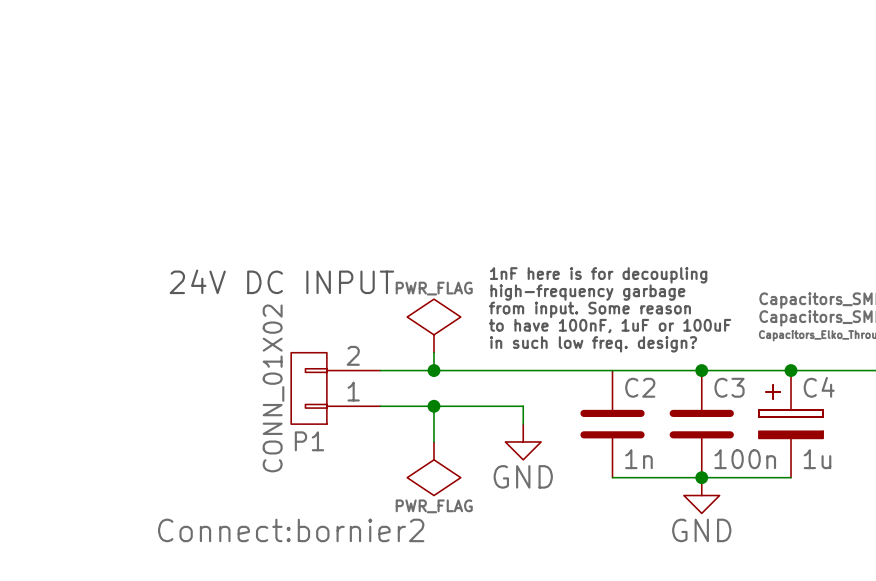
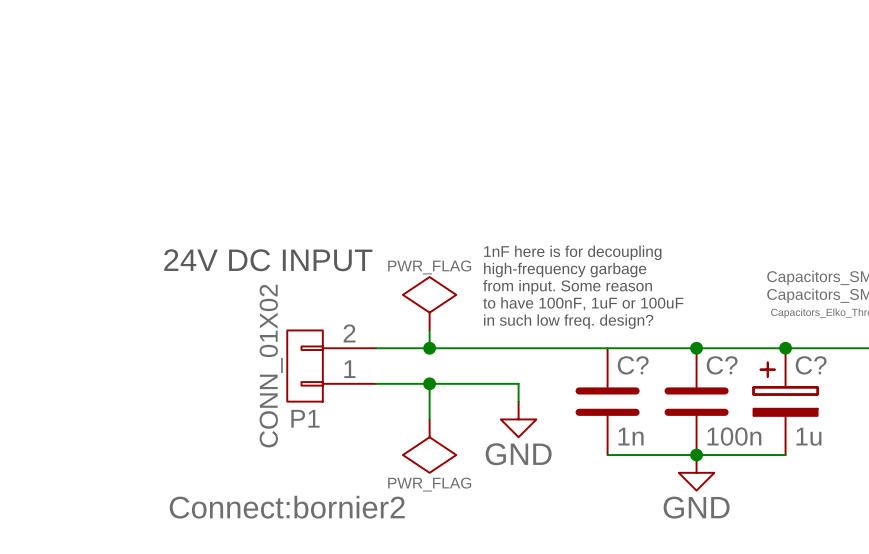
C2 name: C2 (640, 387) -> C? (633, 365)
C3 name: C3 (729, 387) -> C? (722, 365)
C4 name: C4 (819, 387) -> C? (811, 365)

